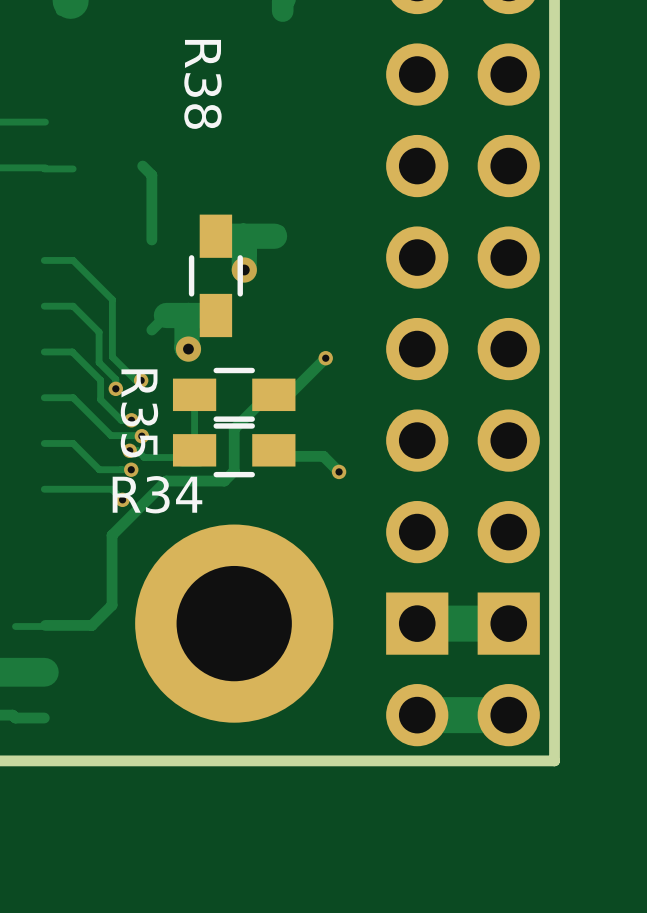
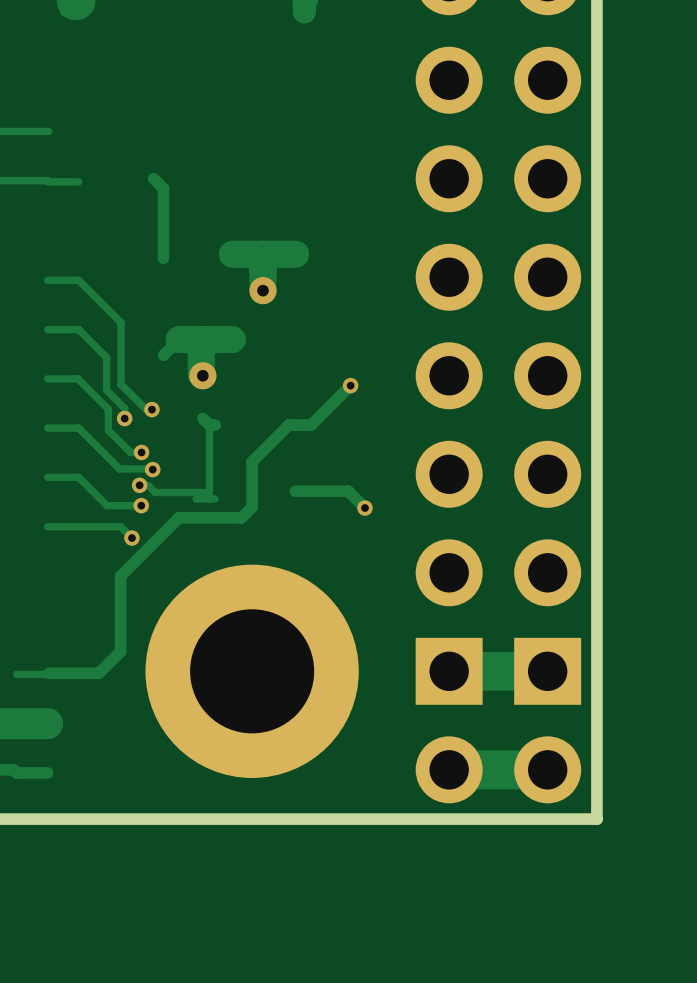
R38: (215, 275) -> none
R35: (234, 394) -> none
R34: (234, 450) -> none

